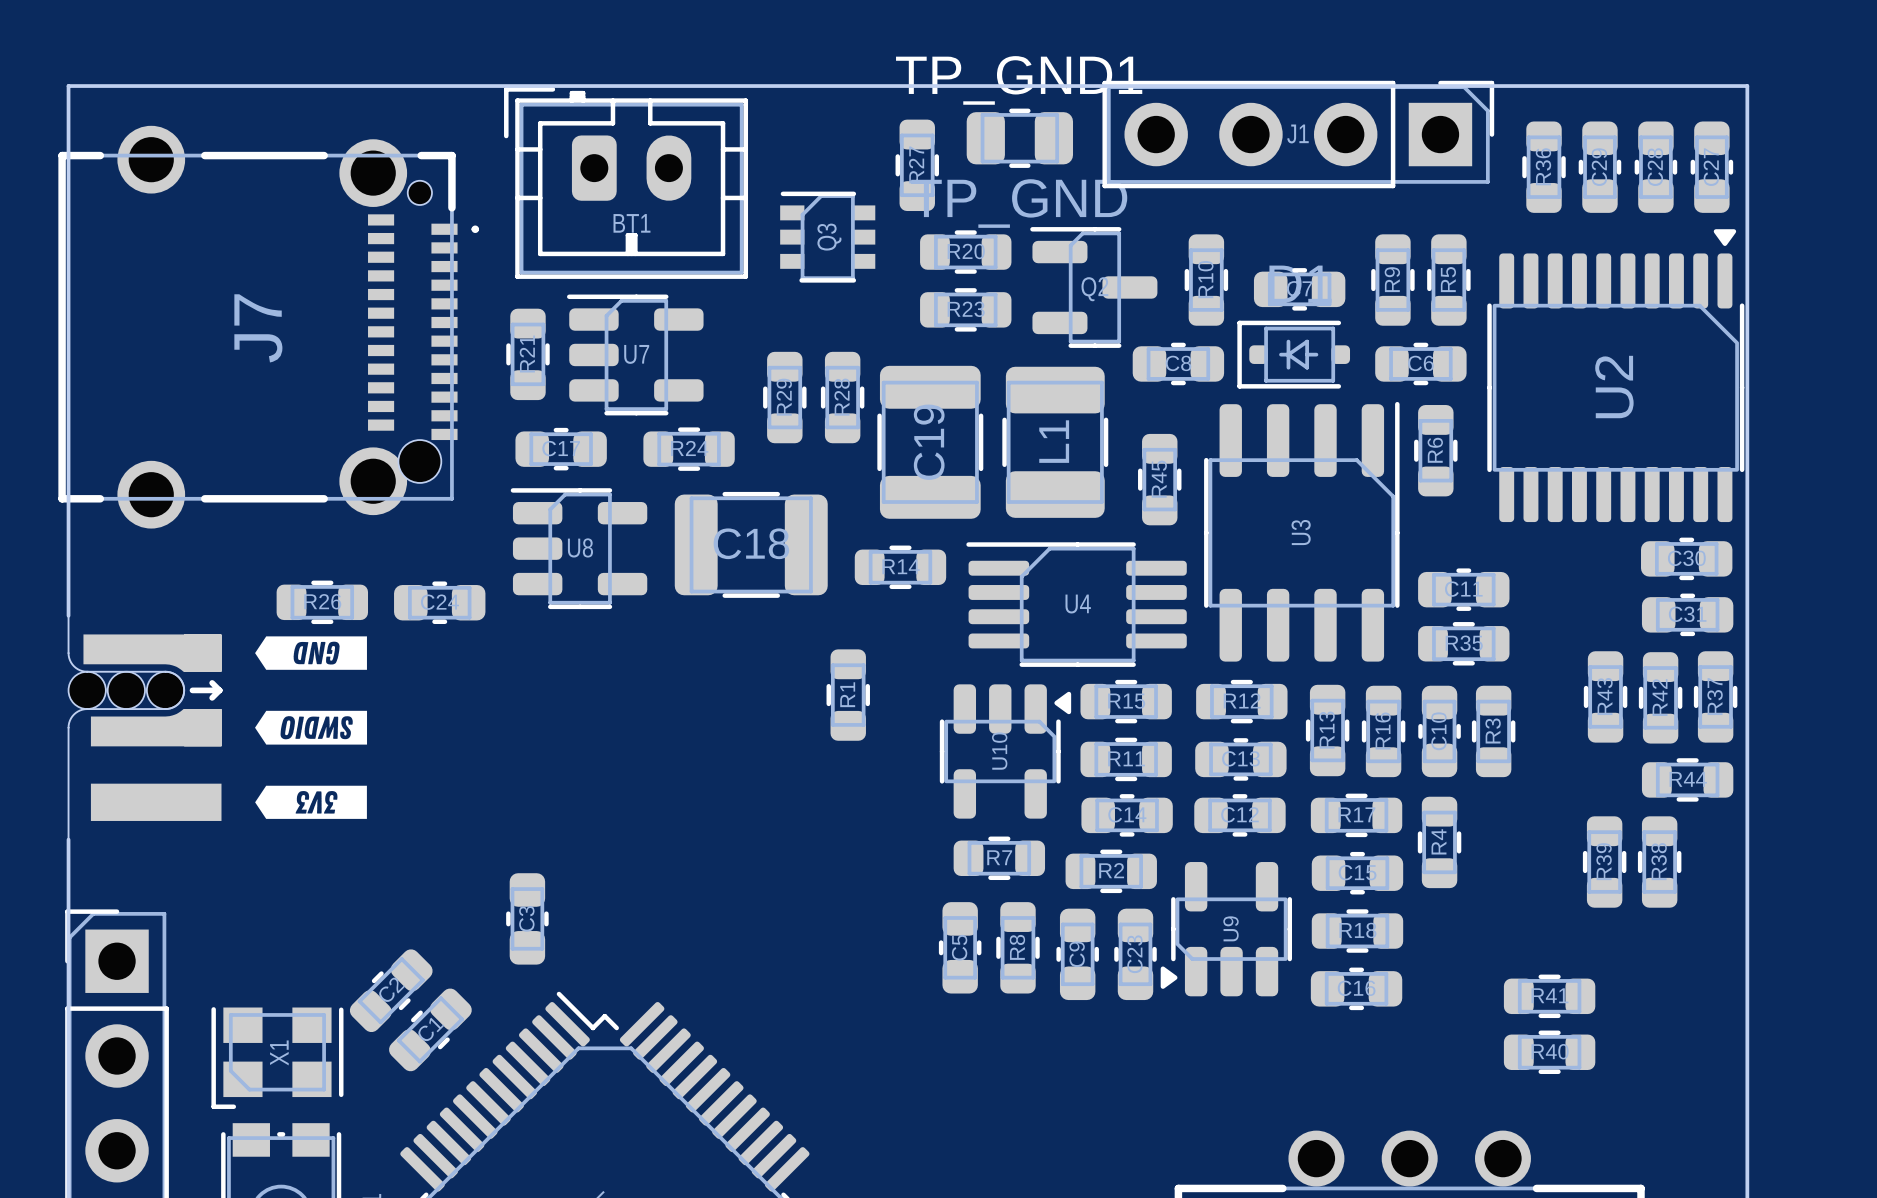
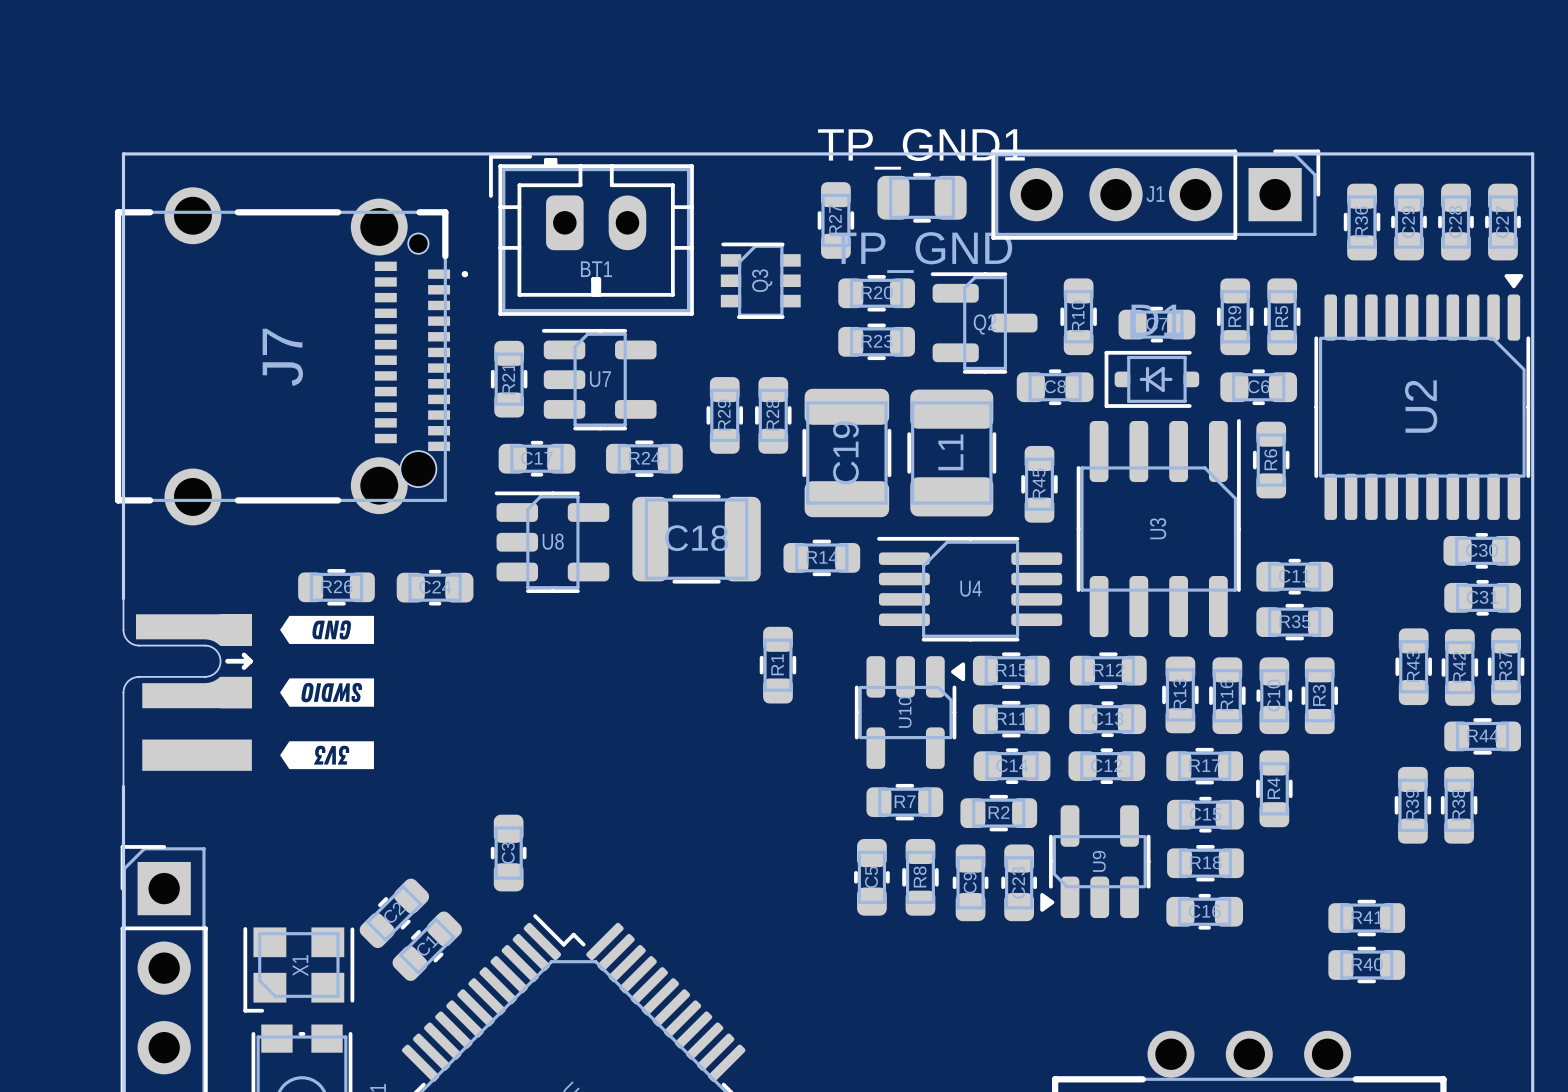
part: (87, 690) -> none
part: (126, 690) -> none
part: (165, 690) -> none

